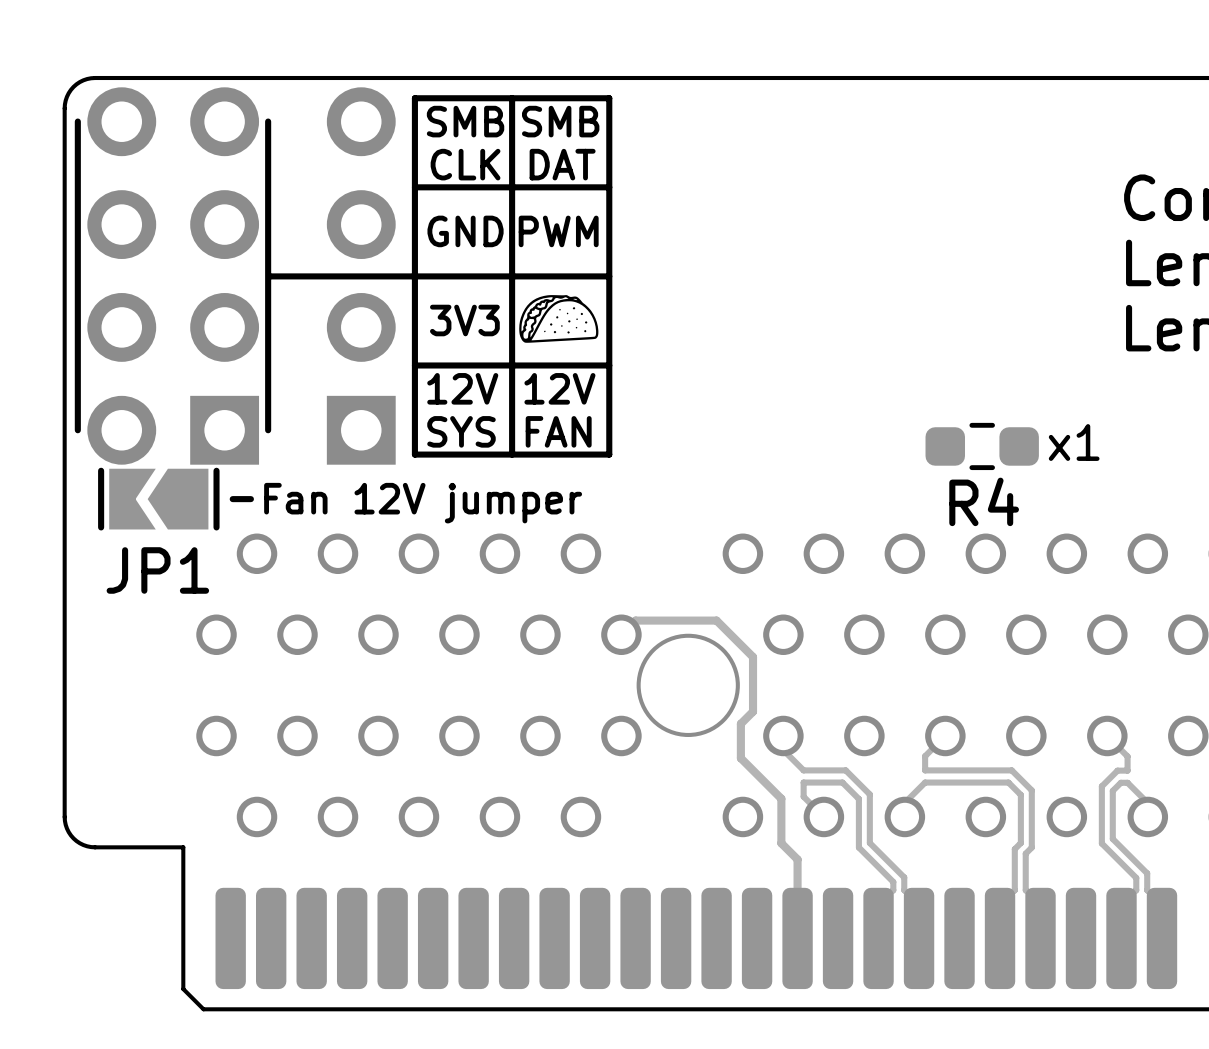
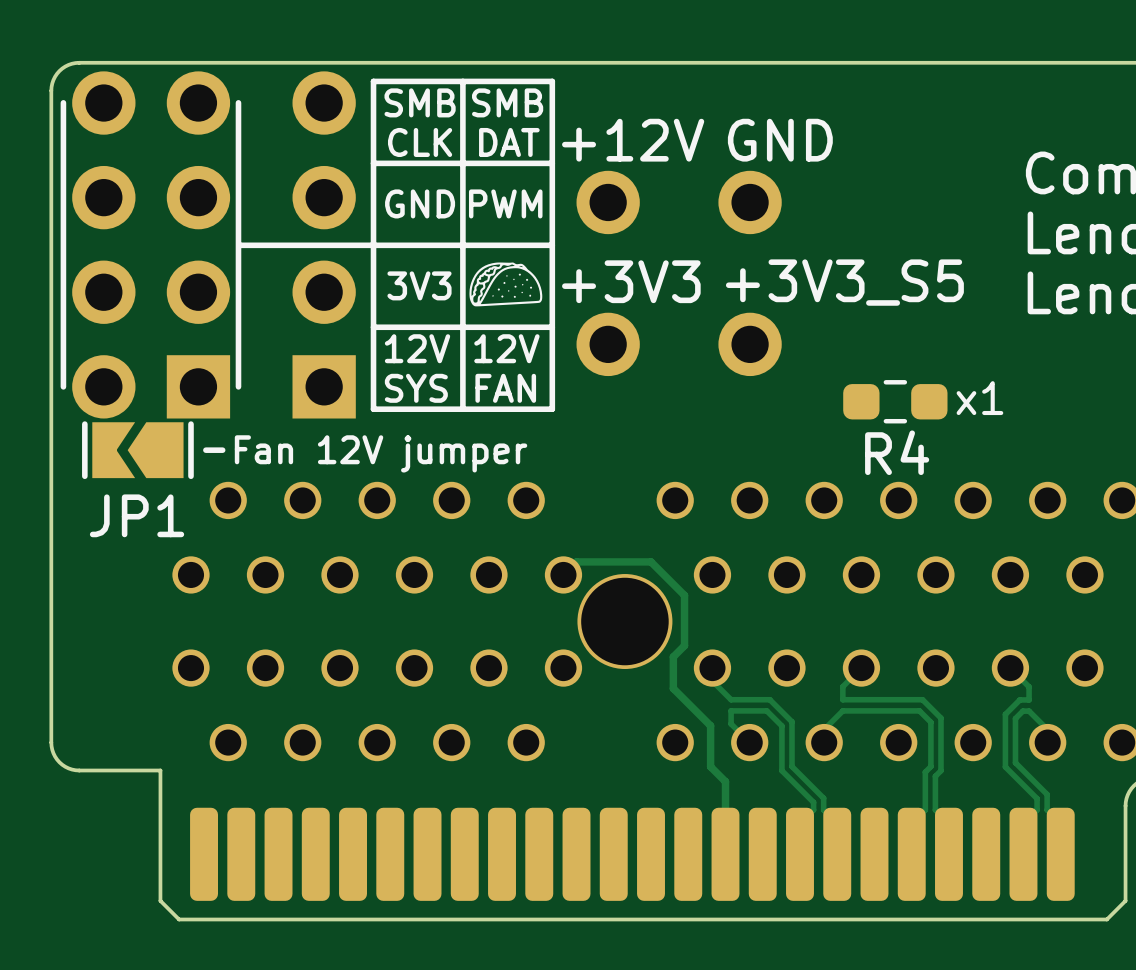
text: none -> +12V (633, 140)
text: none -> GND (780, 140)
part: none -> (608, 202)
part: none -> (750, 202)
text: none -> +3V3 (631, 281)
text: none -> +3V3_S5 (844, 282)
part: none -> (608, 344)
part: none -> (750, 344)

